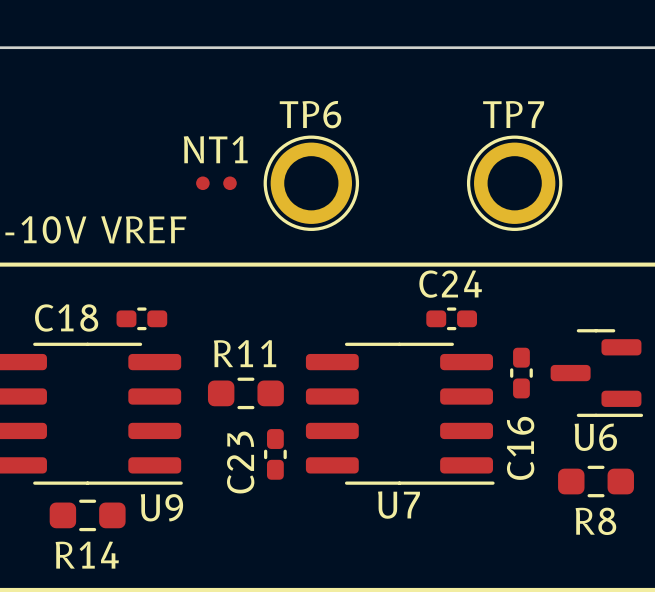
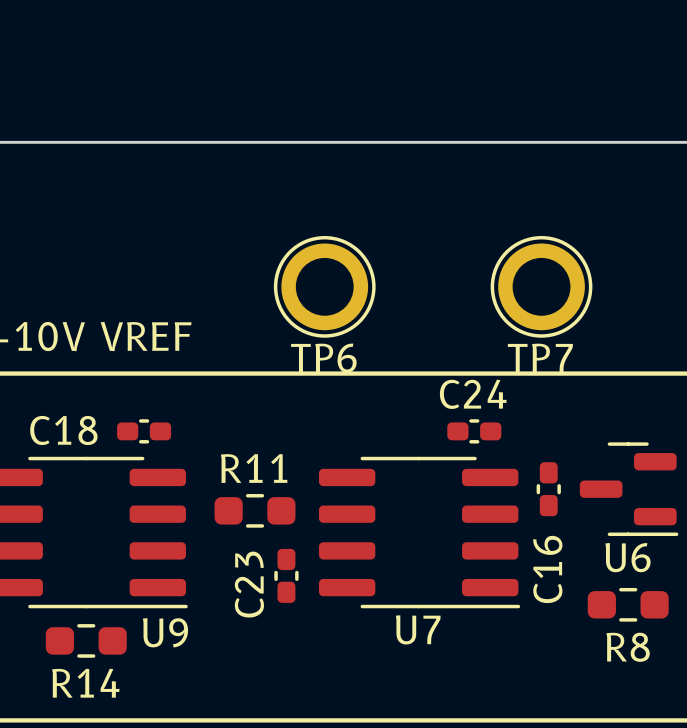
TP6 name position: TP6 (310, 114) -> TP6 (323, 358)
TP7 name position: TP7 (513, 114) -> TP7 (540, 358)
NT1: (216, 183) -> none

